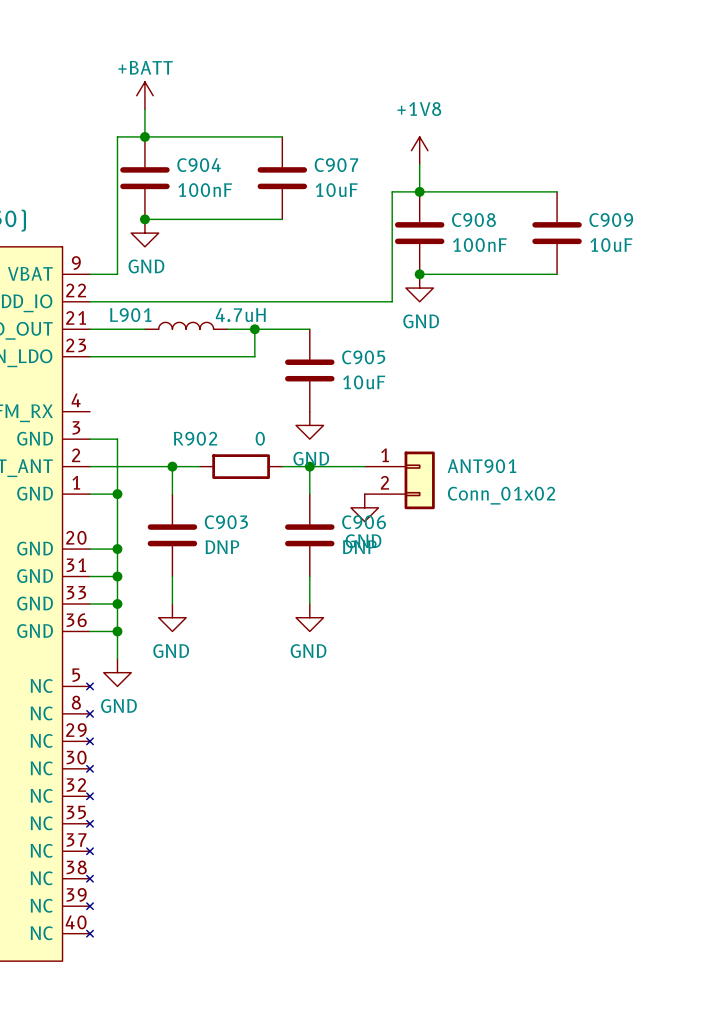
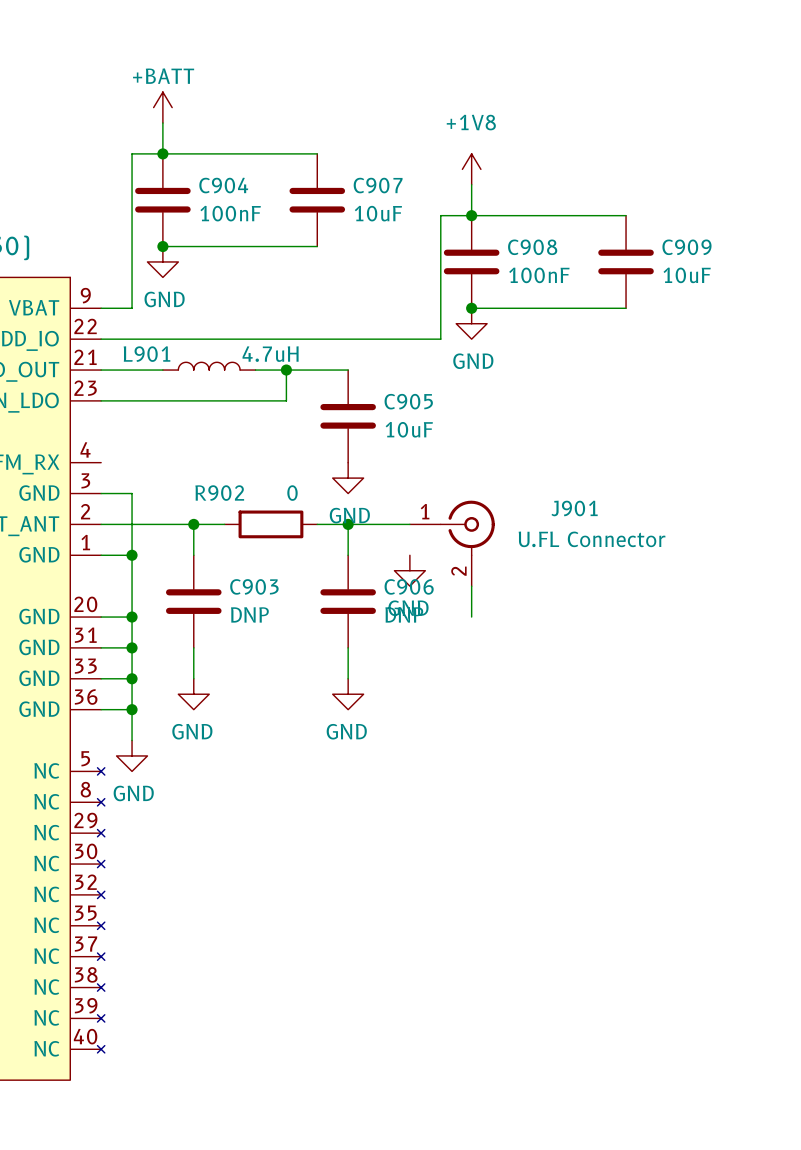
ANT901: Conn_01x02 (399, 480) -> none
J901: none -> U.FL Connector (452, 543)
wire: none -> (471, 586) (471, 617)

